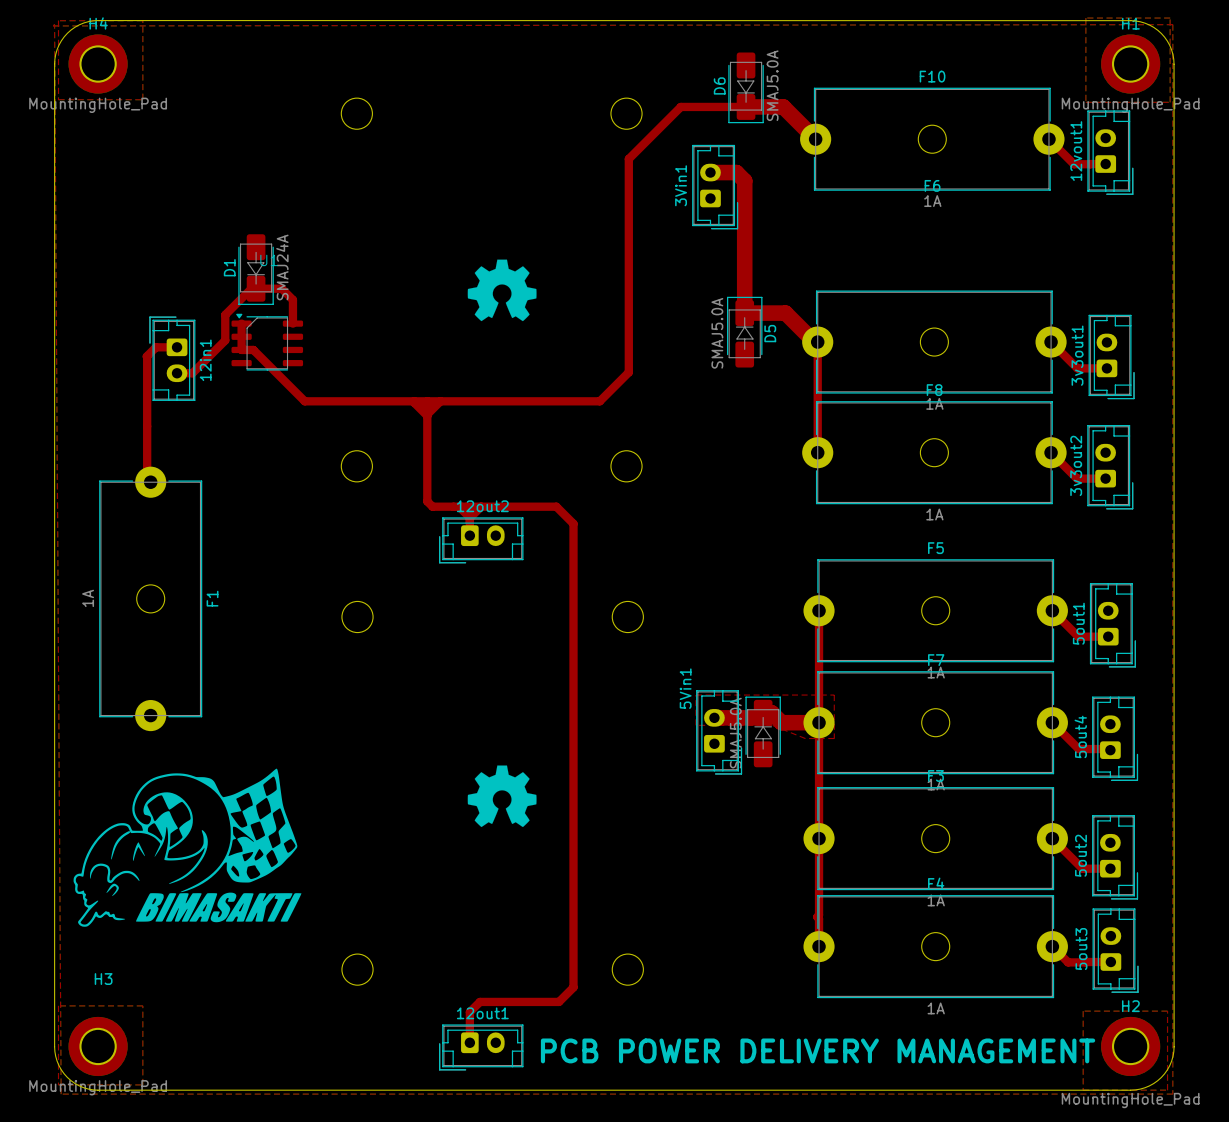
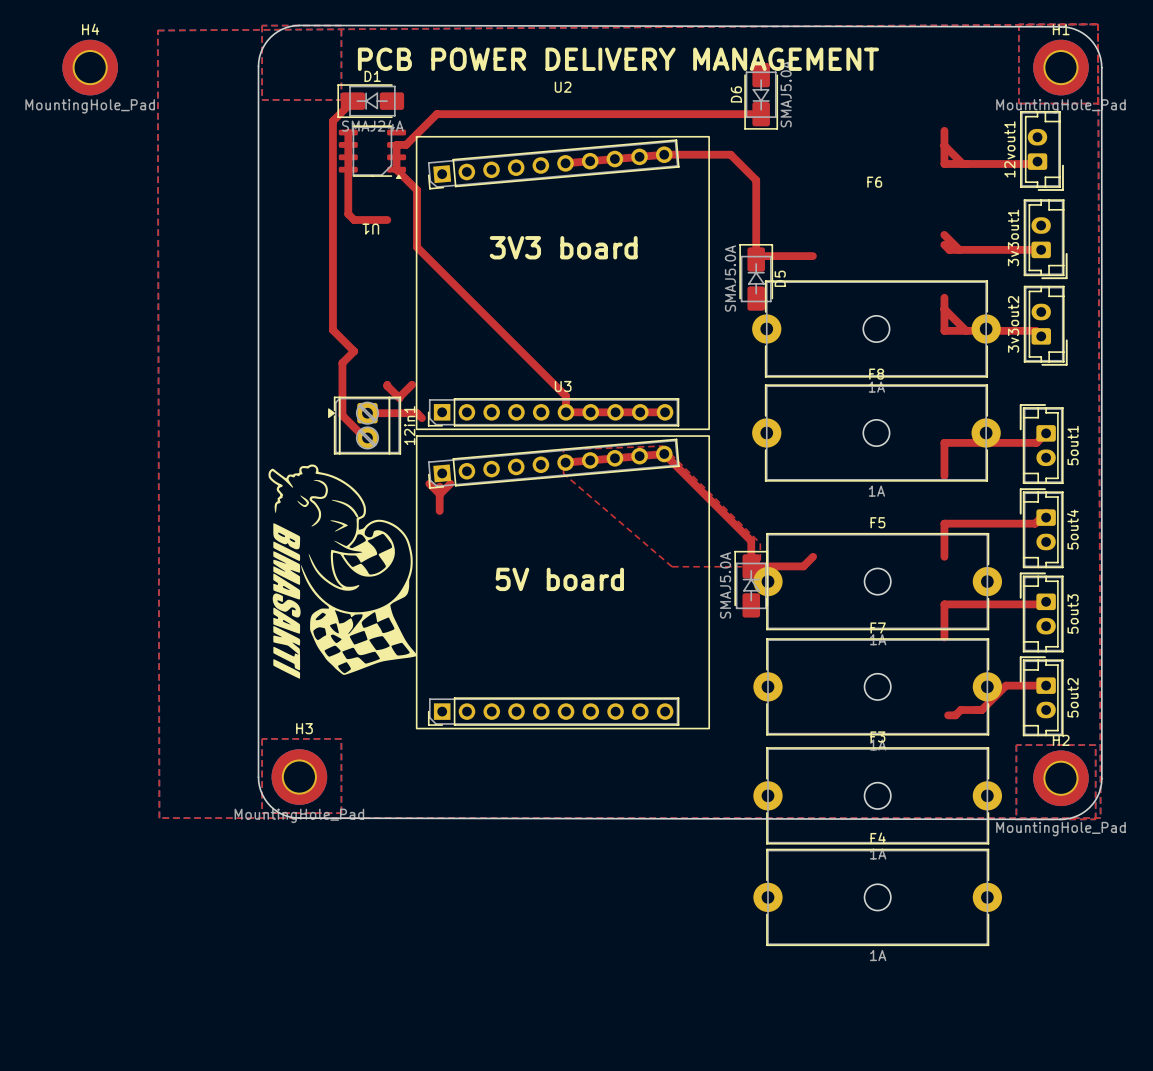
top zone outline: (58, 20) (58, 99) (142, 99) (142, 20) (58, 20) -> (262, 25) (262, 99) (341, 99) (341, 25) (262, 25)
board edge: (1130, 20) (98, 20) (83, 22) (67, 33) (57, 49) (54, 63) (55, 1056) (61, 1069) (70, 1080) (83, 1087) (97, 1090) (1140, 1089) (1153, 1083) (1161, 1077) (1169, 1065) (1173, 1051) (1174, 820) -> (1061, 26) (299, 25) (281, 29) (270, 37) (262, 48) (258, 66) (258, 777) (260, 790) (270, 806) (285, 815) (299, 818) (1060, 819) (1078, 815) (1089, 807) (1099, 792) (1101, 778)
top zone outline: (54, 24) (61, 1094) (1172, 1094) (1172, 24) (53, 25) (54, 24) -> (1098, 24) (157, 30) (159, 818) (1100, 818) (1098, 24)
text: none -> PCB POWER DELIVERY MANAGEMENT (618, 59)
D6 position: (746, 87) -> (761, 96)
round board edge: [341, 97, 373, 130] -> none
round board edge: [610, 97, 643, 130] -> none
top track: none -> (352, 101) (332, 121) (332, 330) (354, 351) (342, 363) (342, 415) (364, 437) (367, 437)
top track: (746, 106) (783, 106) (815, 139) -> none
top track: (755, 108) (753, 106) (680, 106) (628, 158) (628, 372) (599, 401) (304, 401) (253, 349) (241, 349) (241, 323) -> none
top track: none -> (761, 114) (436, 114) (406, 144) (396, 144) (396, 169) (417, 190) (417, 247) (565, 396) (565, 412) (665, 412)
top track: none -> (944, 130) (944, 163) (1037, 163) (1041, 160)
top track: none -> (348, 132) (348, 214) (354, 220) (387, 220)
F10: 1A (932, 139) -> none
top track: (1048, 139) (1074, 164) (1105, 164) -> none
top track: none -> (944, 145) (962, 163)
top track: none -> (565, 163) (664, 154) (730, 154) (756, 180) (756, 259)
top track: (710, 172) (736, 172) (744, 180) (744, 313) -> none
3Vin1: (715, 187) -> none
top track: none -> (944, 234) (959, 249)
top track: none -> (944, 244) (949, 249) (1041, 249)
text: none -> 3V3 board (563, 247)
drawing: [467, 259, 537, 322] -> none
top track: none -> (753, 256) (812, 256)
D1 rotation: 0° (256, 269) -> 90° clockwise (370, 101)
D1 position: (256, 269) -> (370, 101)
U2: none -> (562, 283)
top track: none -> (944, 297) (944, 330) (1035, 330) (1041, 336)
top track: (744, 313) (785, 313) (814, 342) (817, 342) (817, 452) -> none
12in1 footprint: [149, 316, 196, 401] -> [328, 396, 401, 455]
top track: none -> (944, 309) (966, 330)
top track: (292, 323) (292, 299) (281, 288) (251, 288) (225, 314) (225, 340) (192, 373) (177, 373) -> none
D5 position: (744, 332) -> (756, 277)
U1 rotation: 0° (267, 342) -> 180° (372, 152)
U1 position: (267, 342) -> (372, 152)
top track: (1051, 342) (1077, 368) (1106, 368) -> none
top track: (177, 347) (155, 347) (146, 356) (147, 486) -> none
3v3out1 position: (1111, 356) -> (1045, 239)
top track: (427, 401) (427, 501) (432, 506) (556, 506) (573, 523) (573, 987) (559, 1001) (479, 1001) (469, 1012) (469, 1042) -> none
top track: none -> (367, 413) (417, 413) (421, 418)
round board edge: [341, 450, 373, 483] -> none
round board edge: [610, 450, 643, 483] -> none
top track: (1051, 452) (1076, 478) (1105, 478) -> none
top track: none -> (1046, 433) (1036, 442) (944, 442) (944, 476)
top zone outline: none -> (662, 446) (563, 449) (563, 473) (672, 566) (760, 566) (760, 543) (662, 446)
3v3out2 position: (1110, 467) -> (1045, 325)
top track: none -> (565, 462) (664, 453) (751, 540) (751, 566) (803, 566) (813, 556)
drawing: none -> [268, 464, 418, 679]
top track: none -> (1046, 512) (1035, 523) (944, 523) (944, 556)
12out2: (481, 540) -> none
F1: 1A (150, 598) -> none
round board edge: [341, 601, 374, 633] -> none
round board edge: [612, 601, 644, 633] -> none
text: none -> 5V board (559, 579)
top track: (819, 610) (819, 915) (817, 916) (819, 918) (819, 946) -> none
top track: (1052, 610) (1078, 636) (1108, 636) -> none
U3: none -> (562, 582)
5out1 rotation: 0° (1112, 625) -> 180° (1041, 444)
5out1 position: (1112, 625) -> (1041, 444)
top track: none -> (1046, 599) (1040, 604) (944, 604) (944, 637)
top zone outline: (695, 695) (834, 695) (834, 738) (805, 738) (772, 725) (695, 725) (695, 695) -> none
top track: (763, 712) (771, 712) (781, 722) (819, 722) -> none
top track: (714, 717) (758, 717) -> none
top track: none -> (1046, 685) (1006, 685) (981, 710) (960, 710) (955, 715) (948, 715)
top track: (1052, 722) (1078, 749) (1110, 750) -> none
part position: (763, 731) -> (751, 584)
5Vin1: (719, 732) -> none
5out4 rotation: 0° (1115, 738) -> 180° (1041, 528)
5out4 position: (1115, 738) -> (1041, 528)
drawing: [467, 765, 537, 828] -> none
drawing: [73, 768, 302, 927] -> none
top zone outline: none -> (262, 738) (262, 813) (341, 813) (341, 738) (262, 738)
top track: (1052, 838) (1082, 868) (1110, 868) -> none
5out2 rotation: 0° (1115, 857) -> 180° (1041, 696)
5out2 position: (1115, 857) -> (1041, 696)
top track: (1052, 946) (1068, 962) (1110, 962) -> none
5out3 rotation: 0° (1115, 950) -> 180° (1041, 612)
5out3 position: (1115, 950) -> (1041, 612)
round board edge: [341, 953, 374, 986] -> none
round board edge: [612, 953, 644, 986] -> none
H3 name position: H3 (103, 979) -> H3 (304, 728)
top zone outline: (58, 1005) (58, 1084) (142, 1084) (142, 1005) (58, 1005) -> none
top zone outline: (1083, 1011) (1083, 1090) (1167, 1090) (1167, 1011) (1083, 1011) -> (1016, 745) (1016, 819) (1095, 819) (1095, 745) (1016, 745)
H3 position: (98, 1046) -> (299, 777)
H2 position: (1130, 1046) -> (1060, 778)
12out1: (481, 1047) -> none
text: PCB POWER DELIVERY MANAGEMENT (818, 1050) -> none

